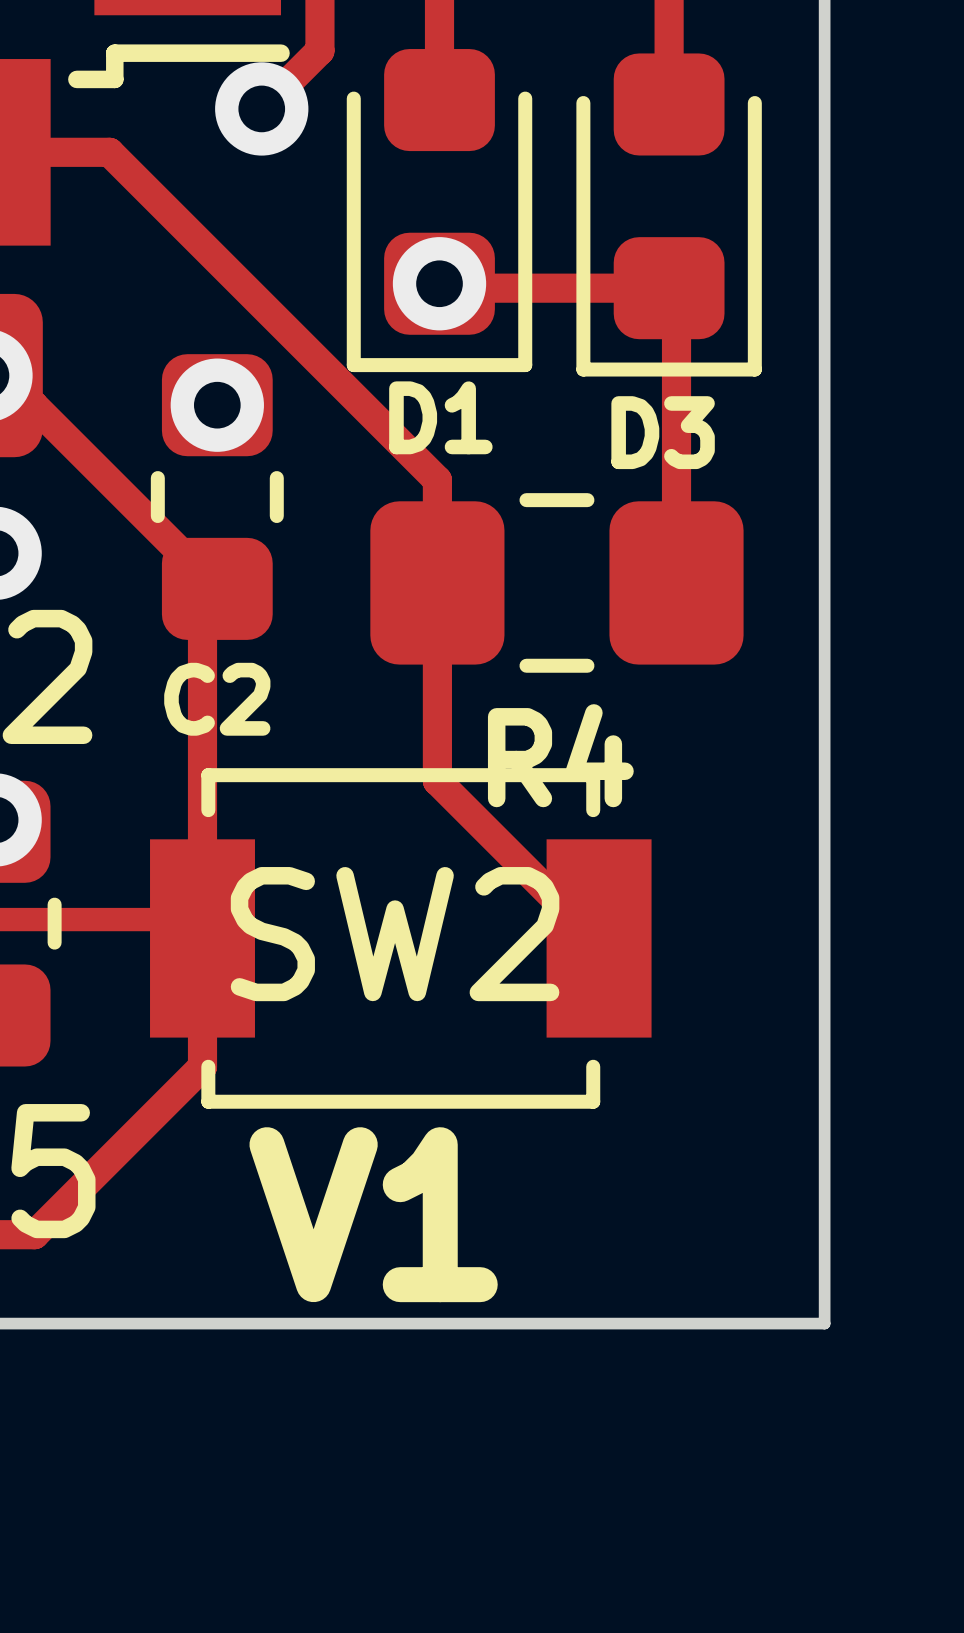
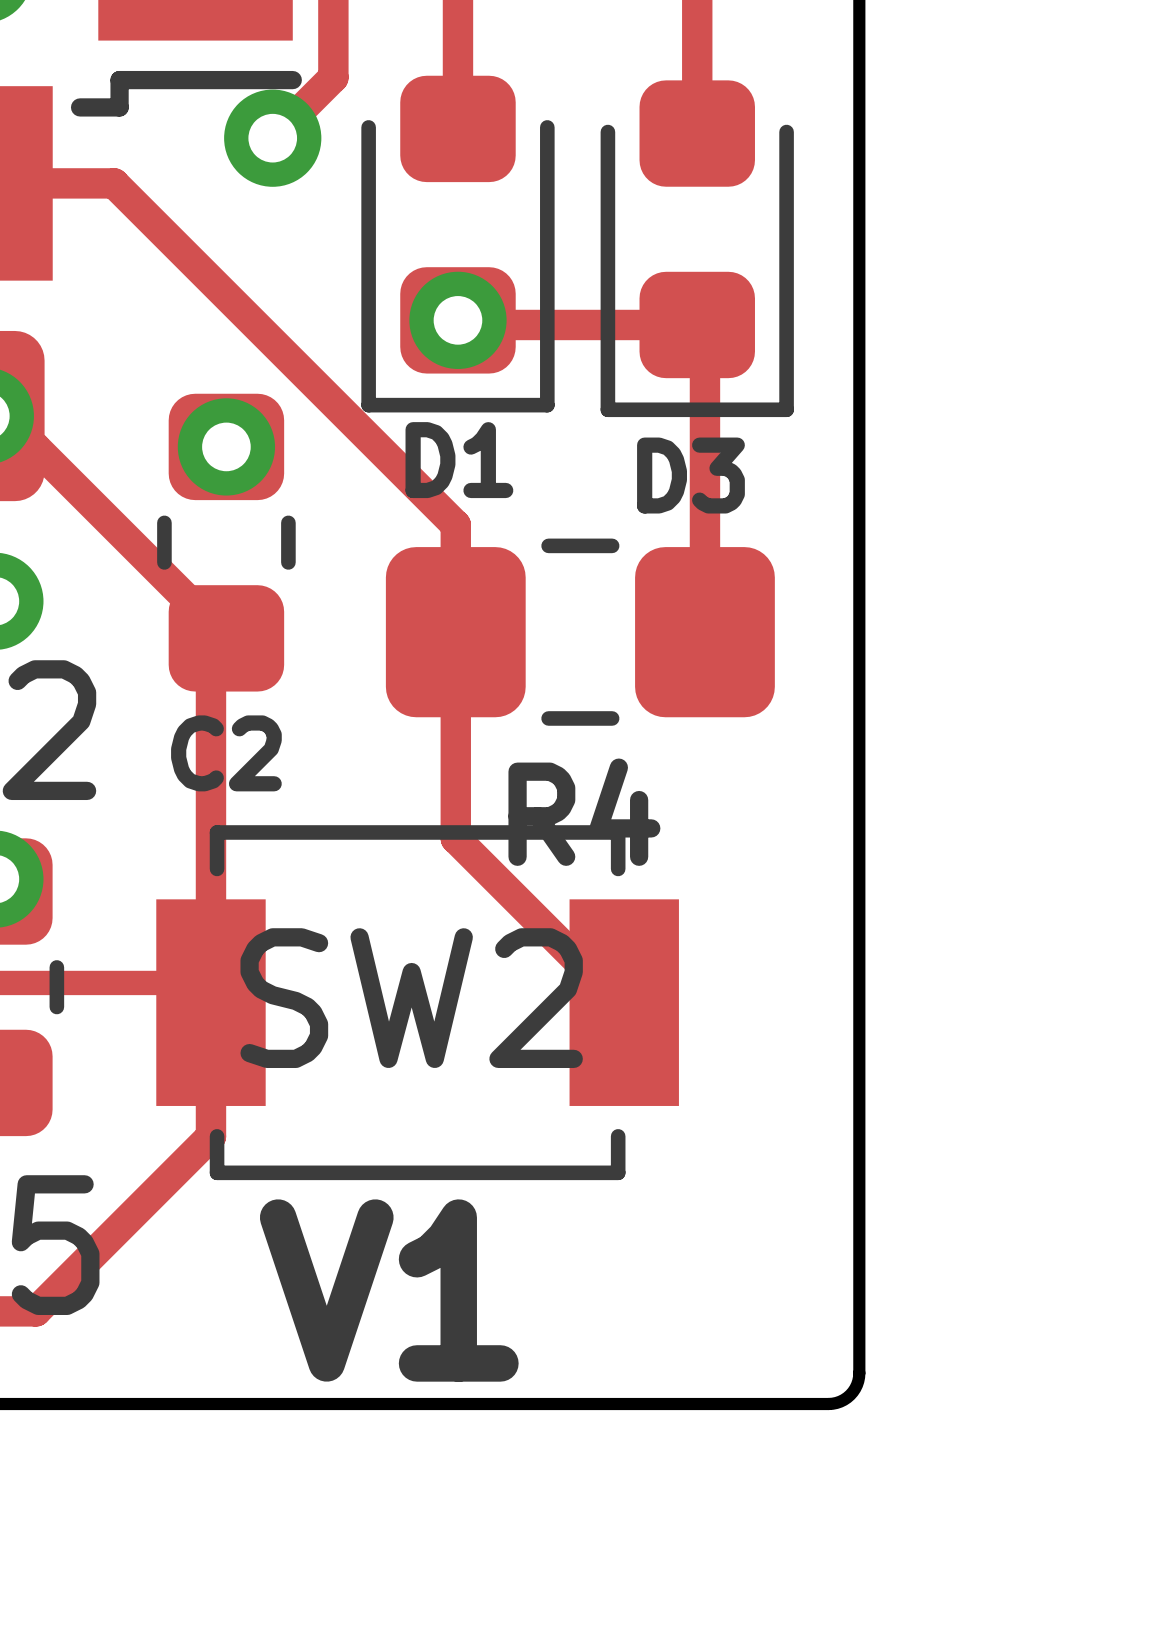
board edge: (824, 1293) (824, 1323) (795, 1323) -> (859, 1373) (856, 1384) (850, 1394) (840, 1401) (828, 1404)

